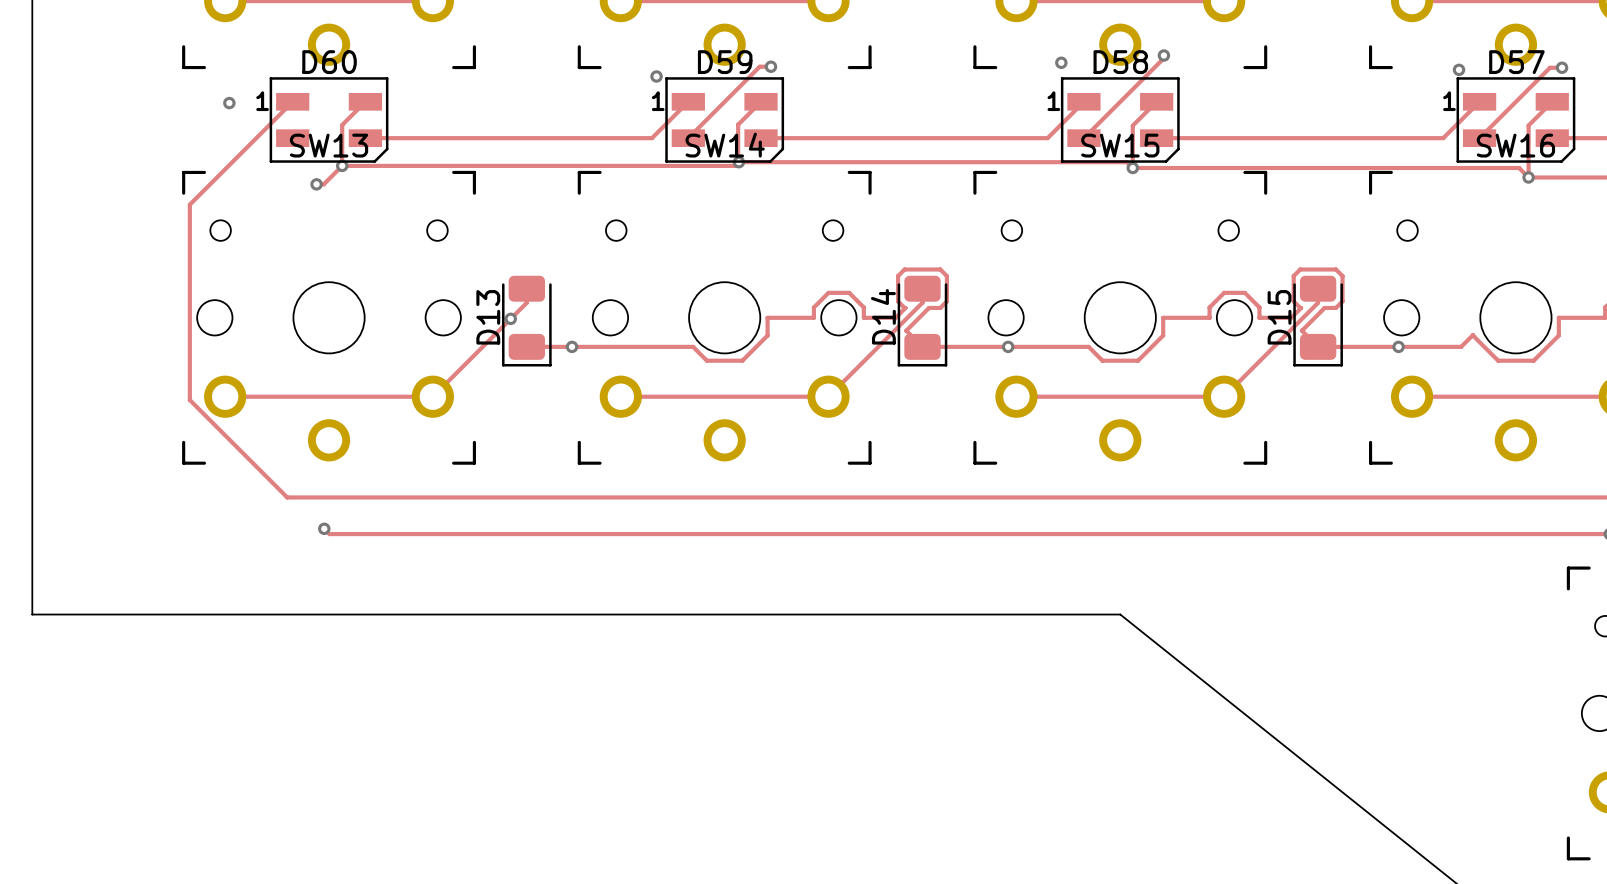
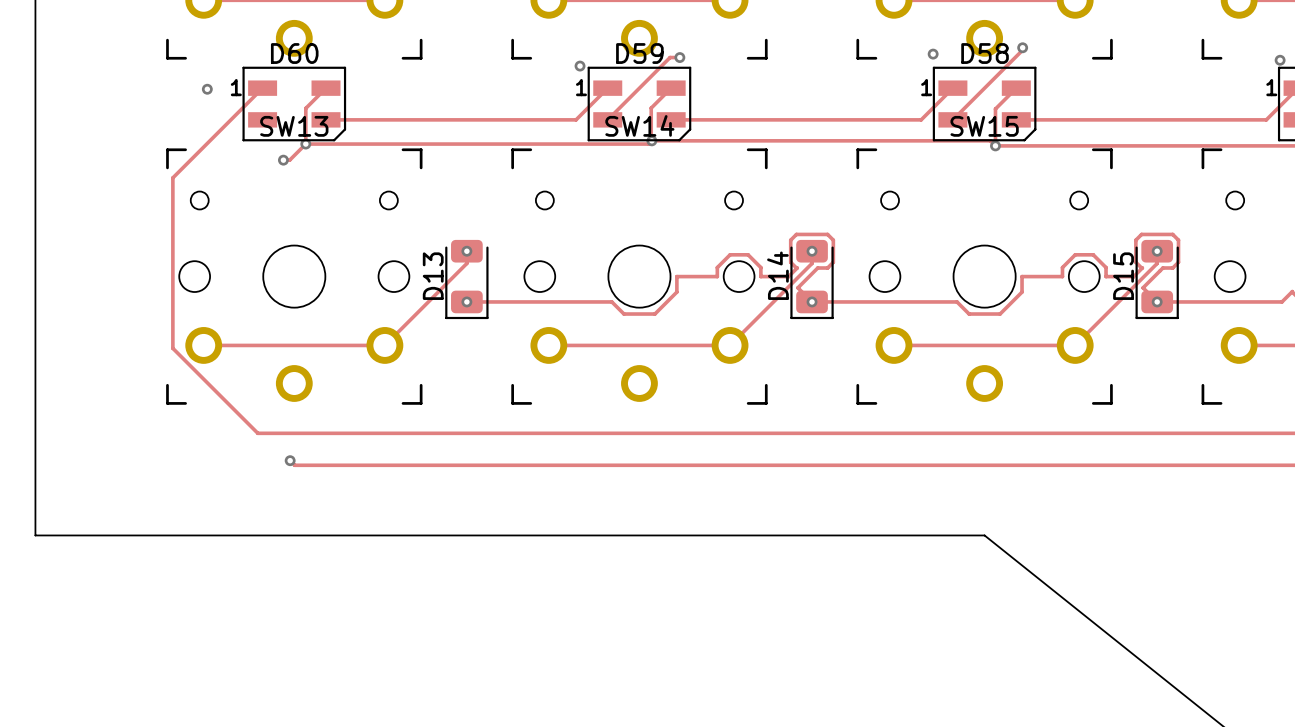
via: none -> (466, 251)
via: none -> (812, 251)
via: none -> (1157, 251)
via: (510, 318) -> none
via: none -> (466, 301)
via: (572, 346) -> none
via: none -> (812, 301)
via: (1008, 346) -> none
via: none -> (1157, 301)
via: (1398, 346) -> none

